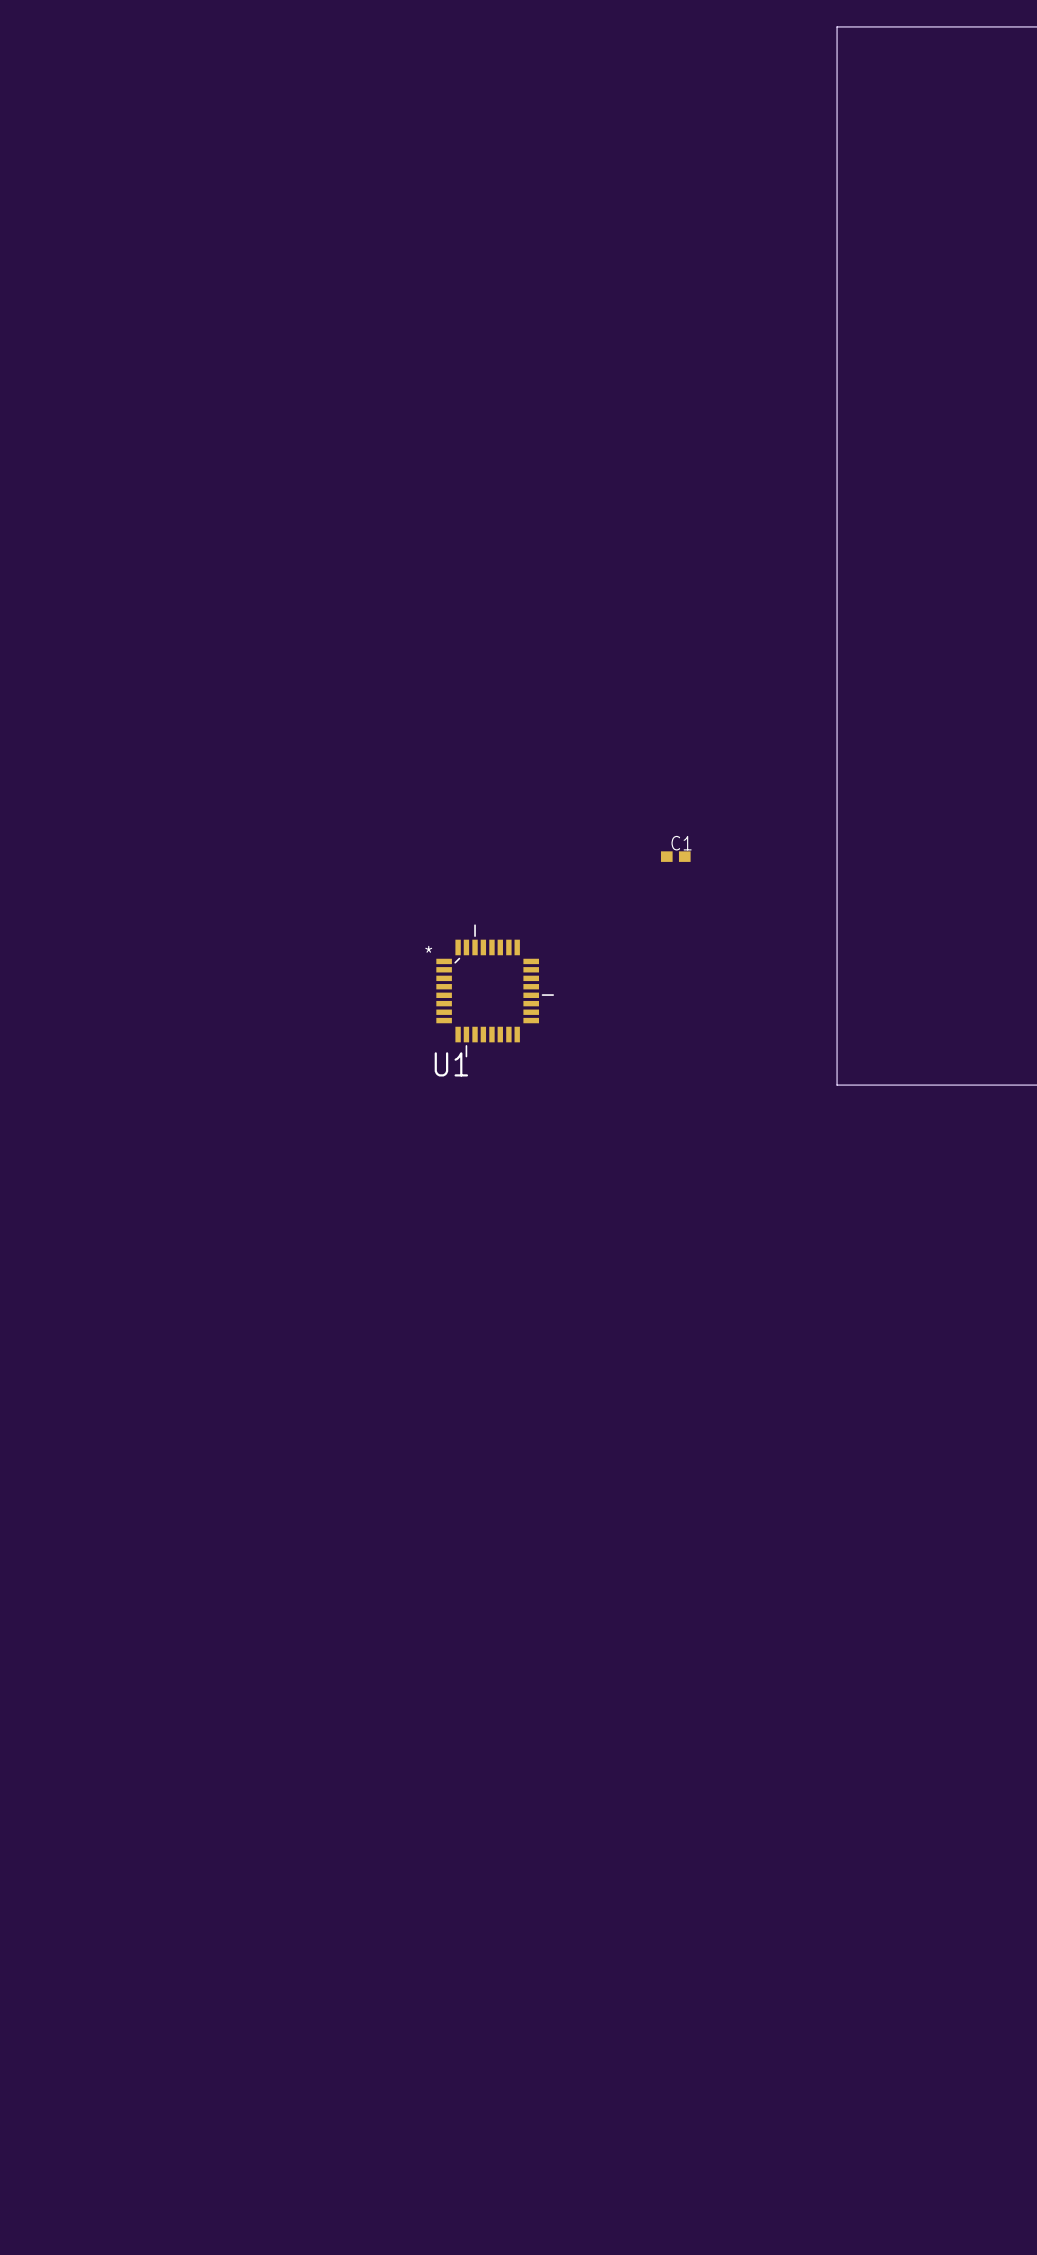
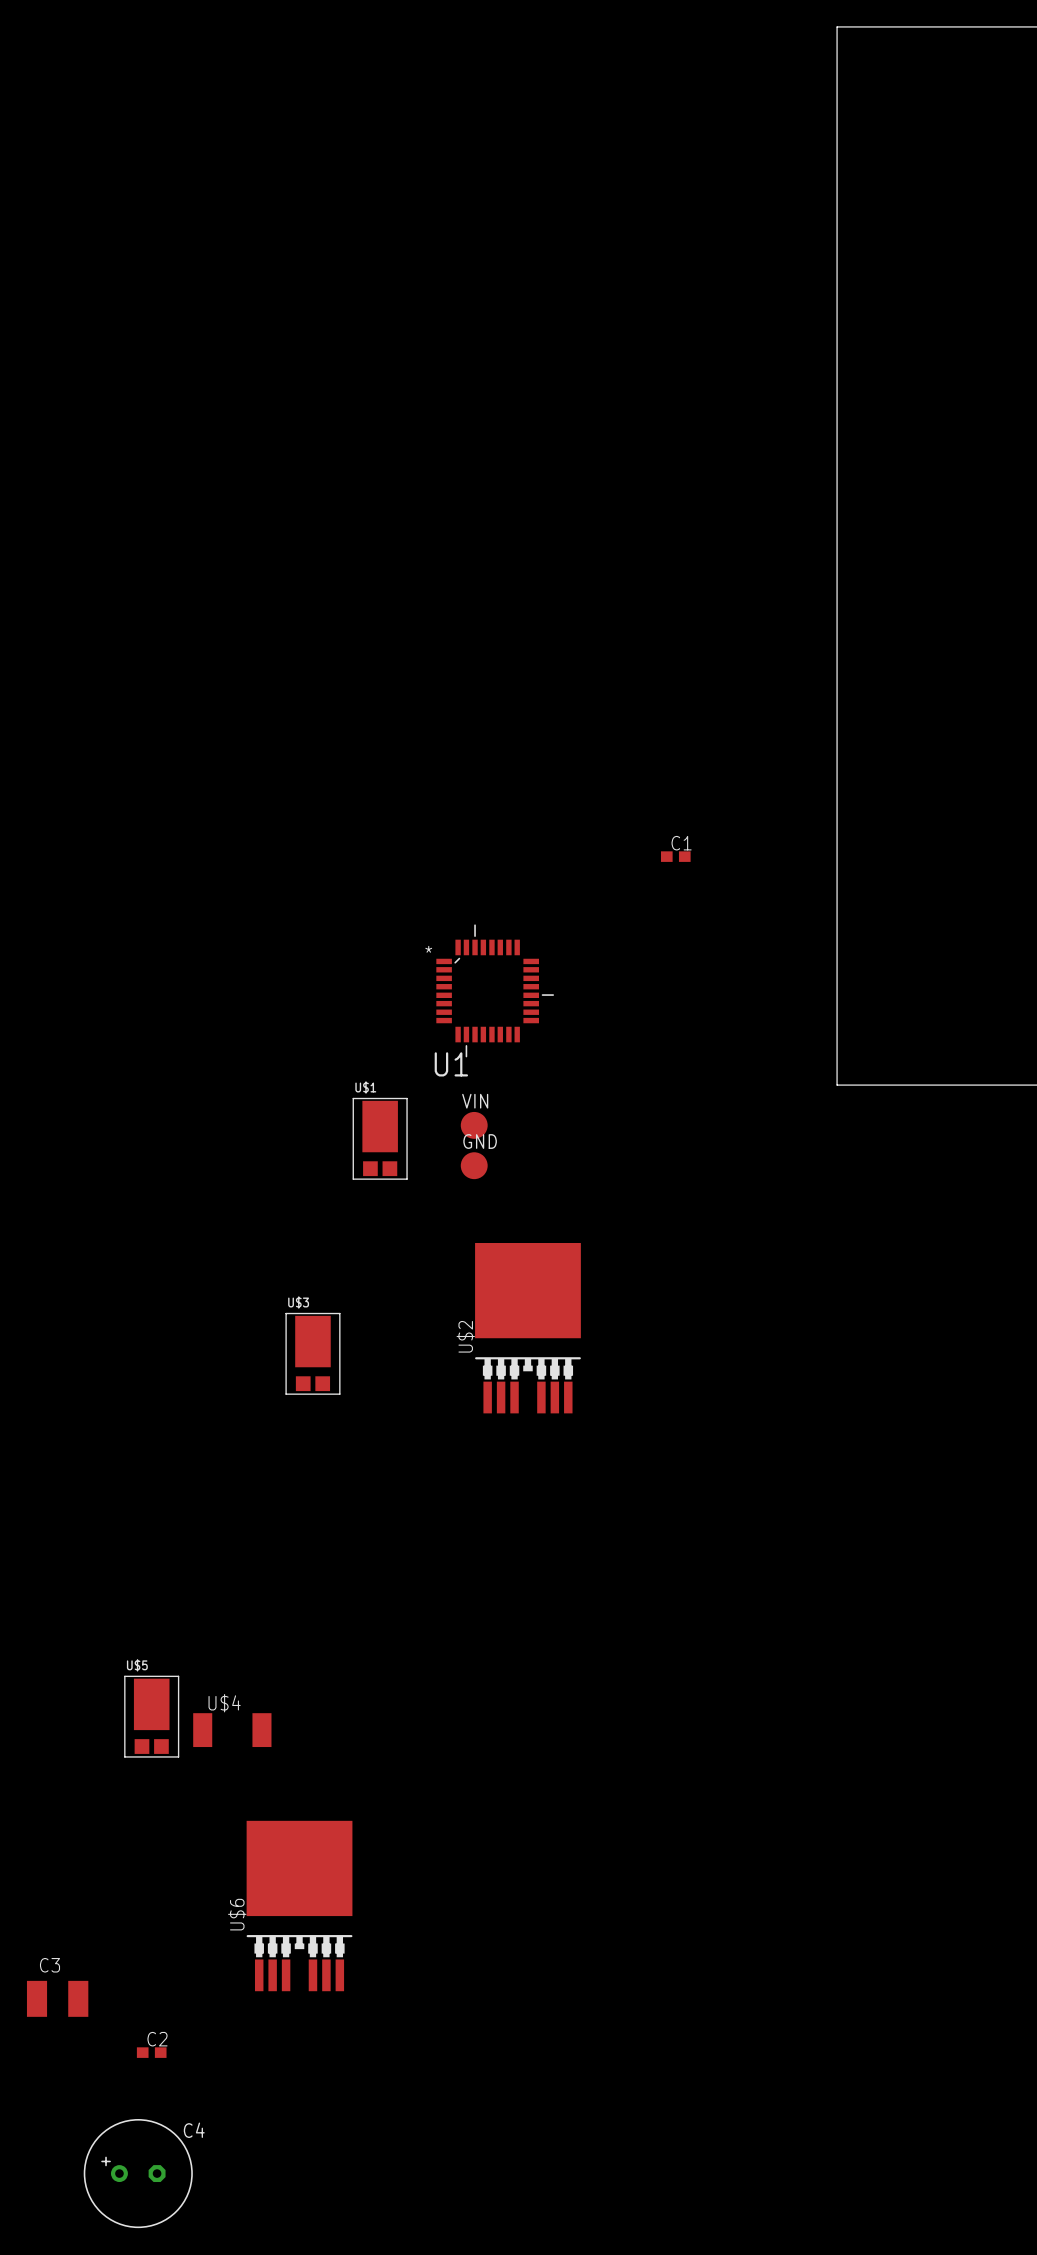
VIN: none -> (474, 1125)
U$1: none -> (380, 1138)
GND: none -> (474, 1165)
U$2: none -> (527, 1328)
U$3: none -> (312, 1353)
U$5: none -> (151, 1716)
U$4: none -> (232, 1730)
U$6: none -> (299, 1906)
C3: none -> (57, 1998)
C2: none -> (151, 2052)
C4: none -> (138, 2173)

